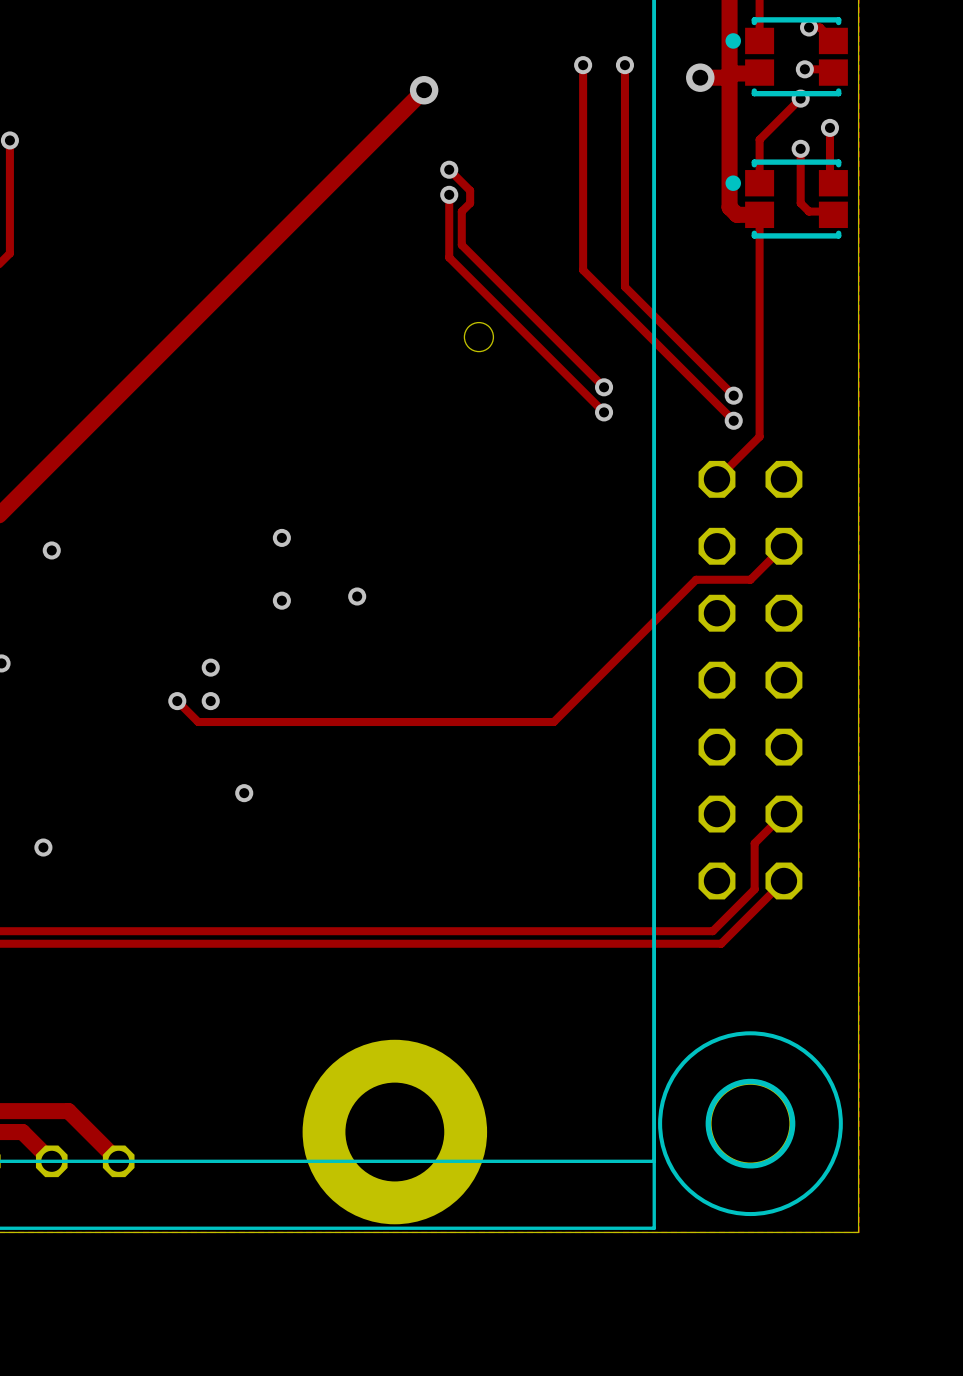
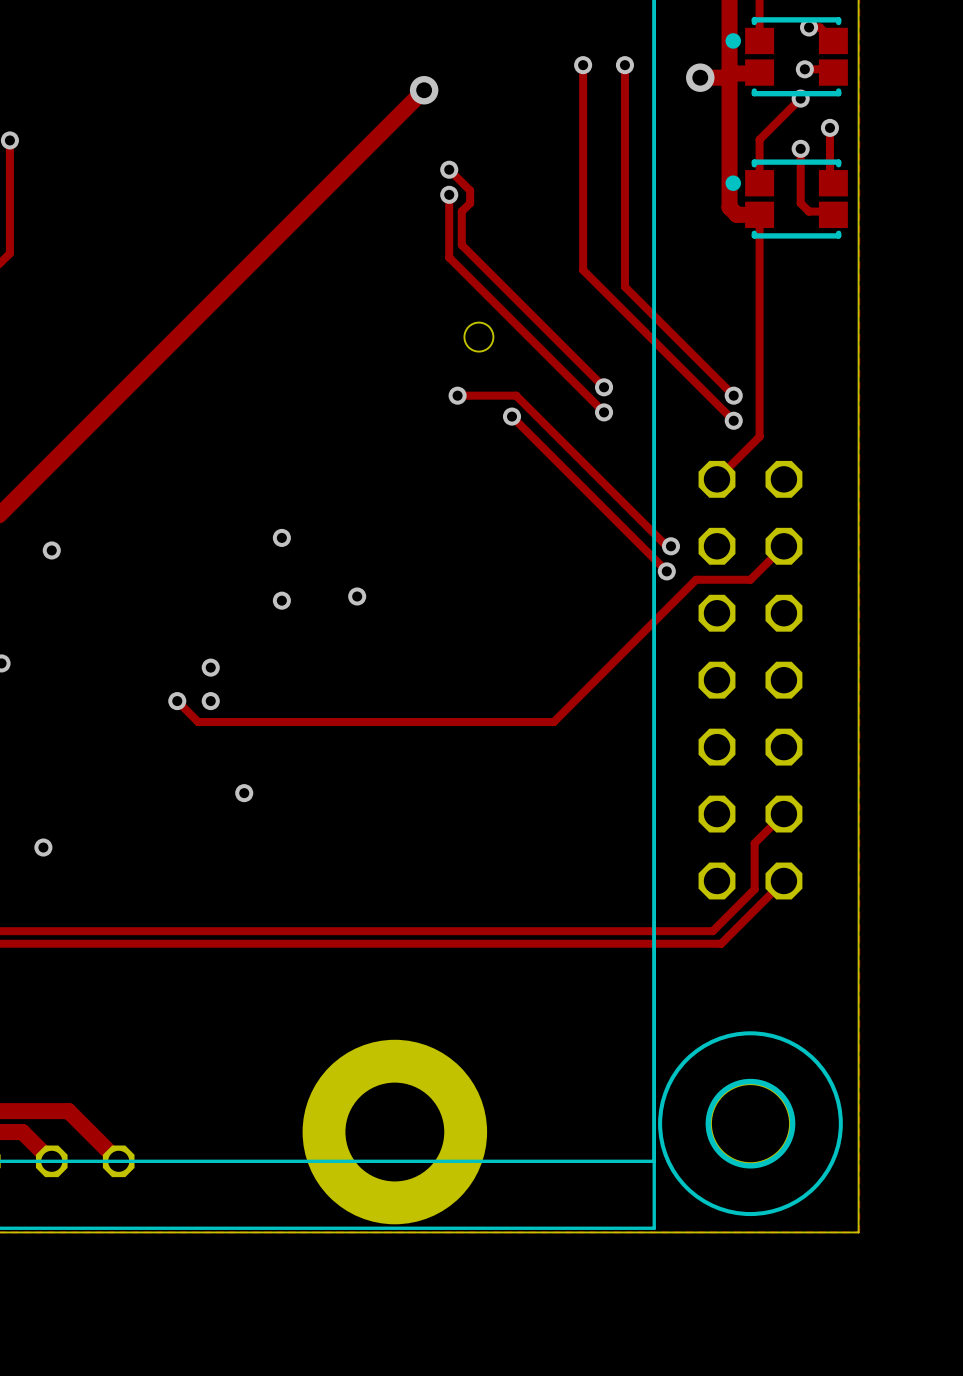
track: none -> (457, 395) (516, 395) (666, 546) (670, 546)
via: none -> (457, 395)
track: none -> (511, 416) (666, 571)
via: none -> (511, 416)
via: none -> (670, 546)
via: none -> (666, 571)

